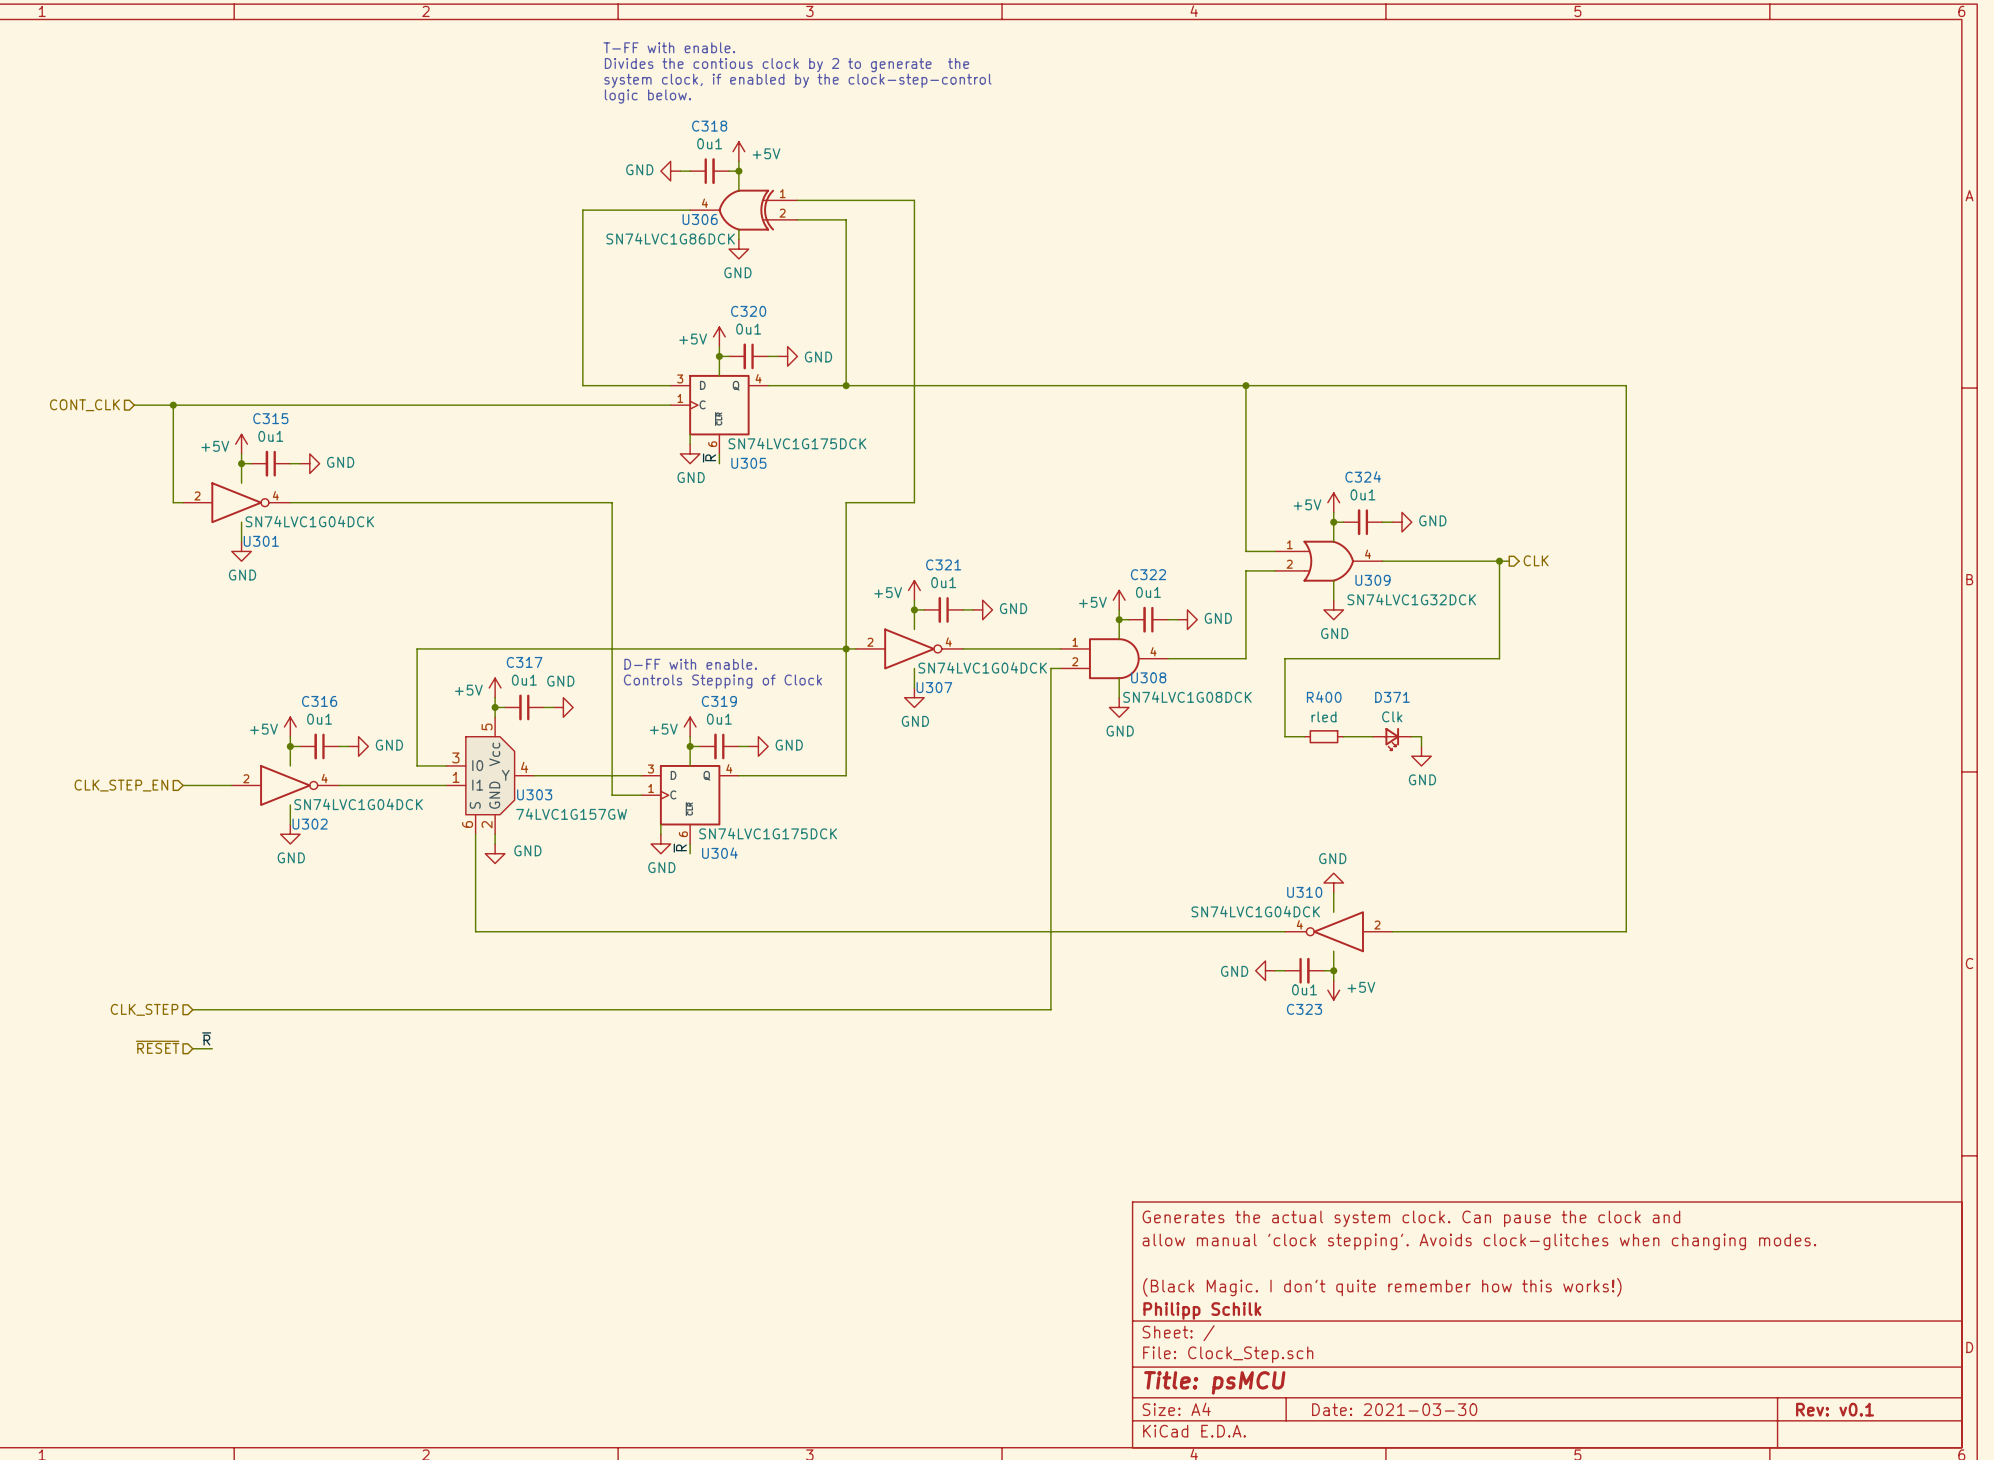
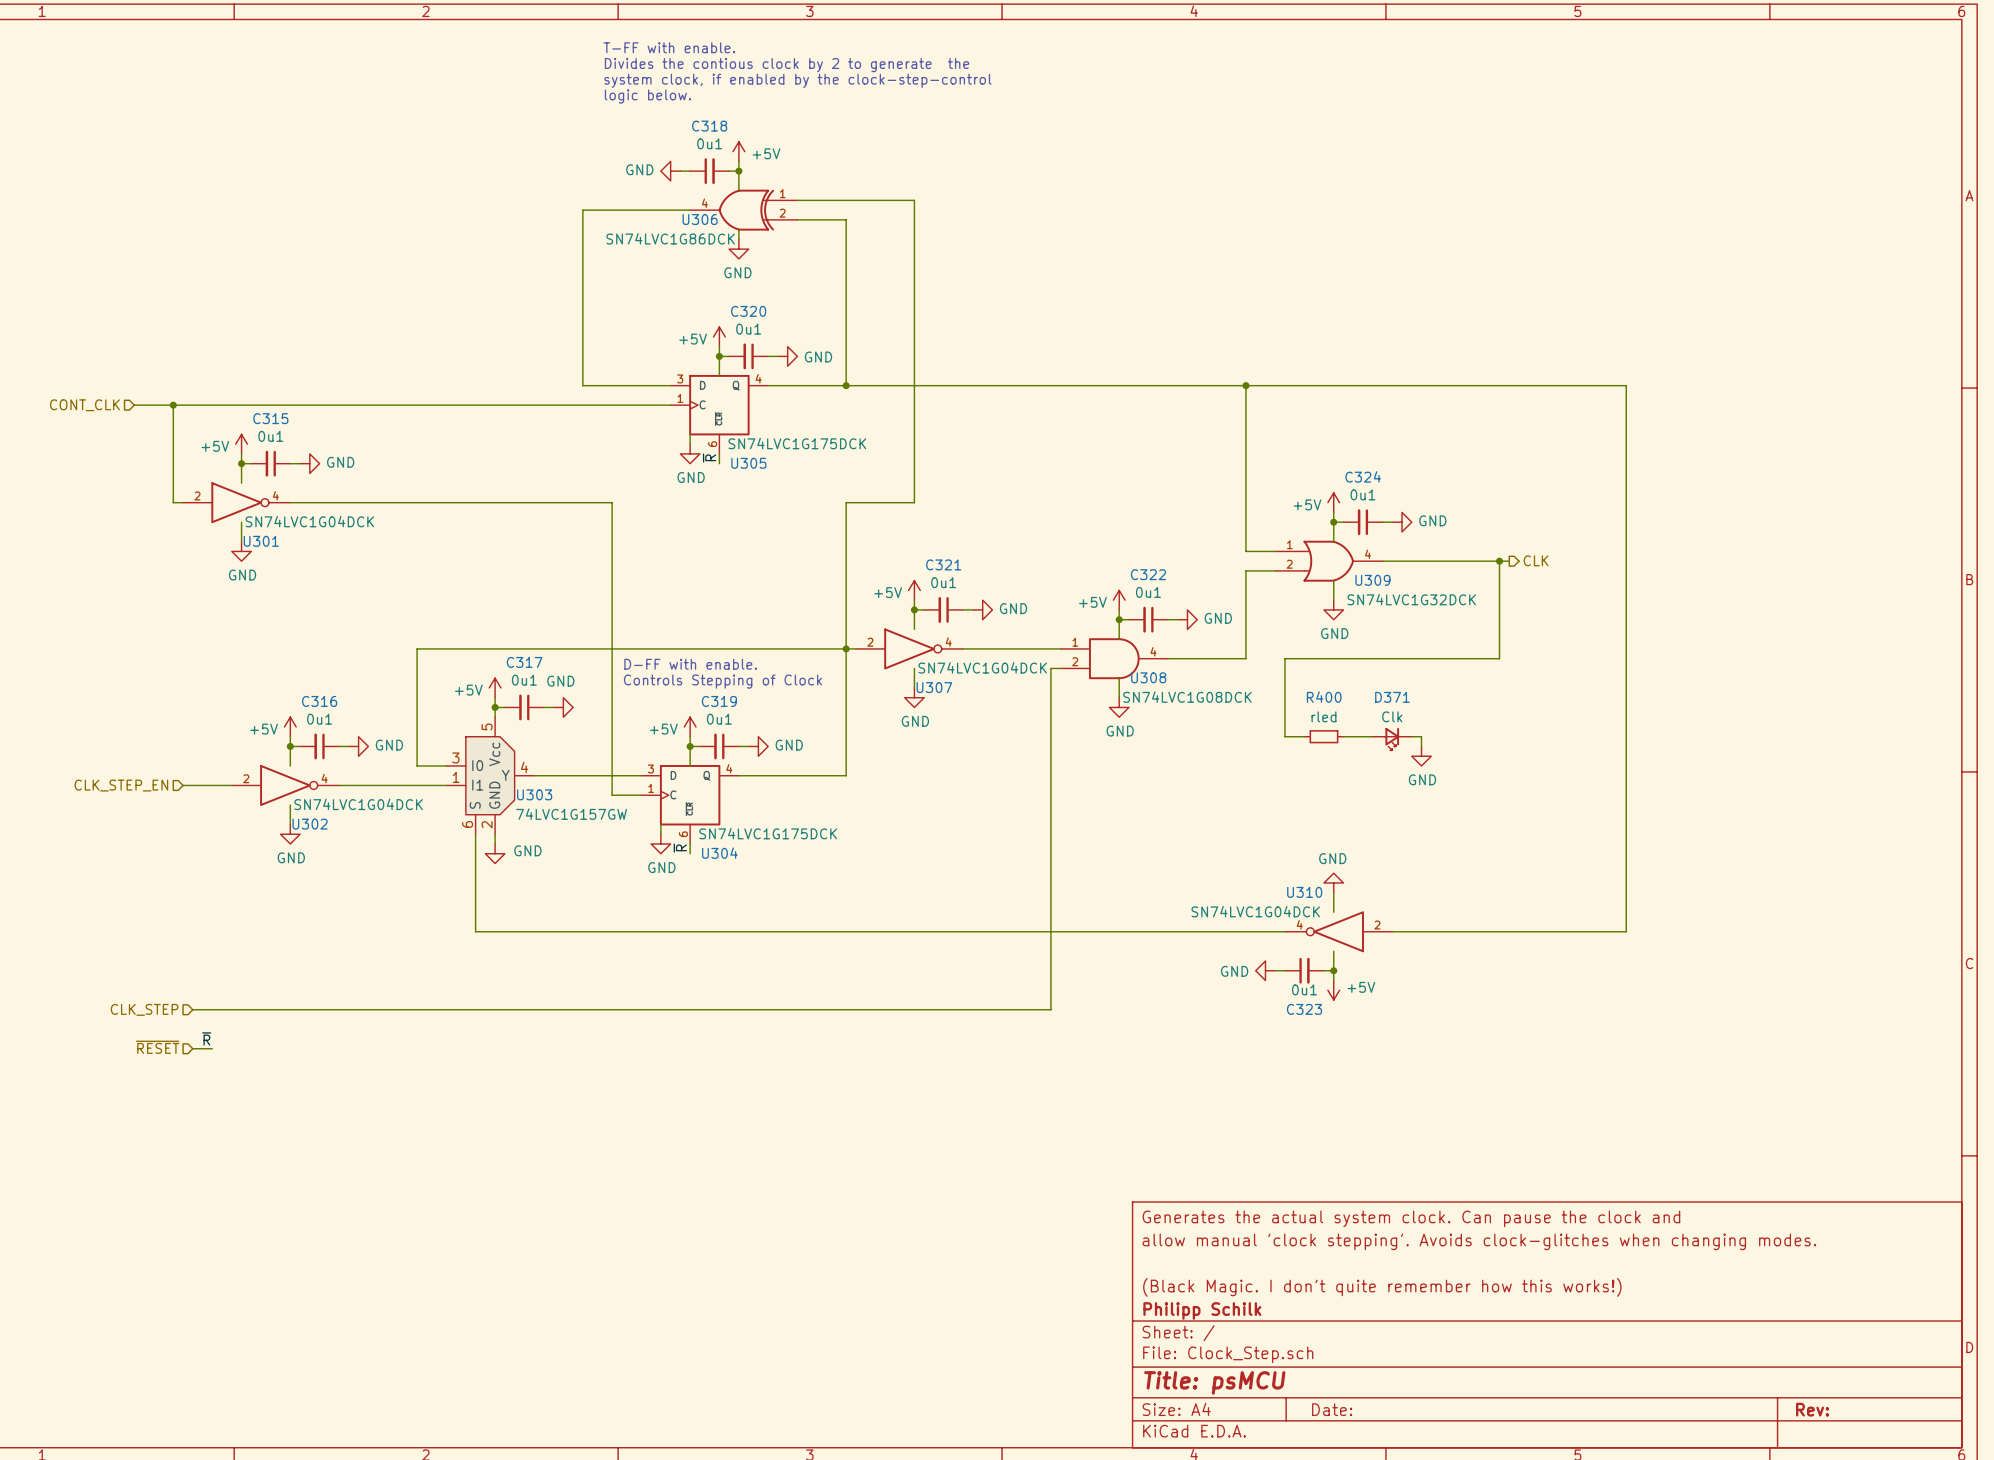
title block: Date: 2021-03-30 (1394, 1409) -> Date: (1332, 1409)
title block: Rev: v0.1 (1835, 1409) -> Rev: (1812, 1409)

